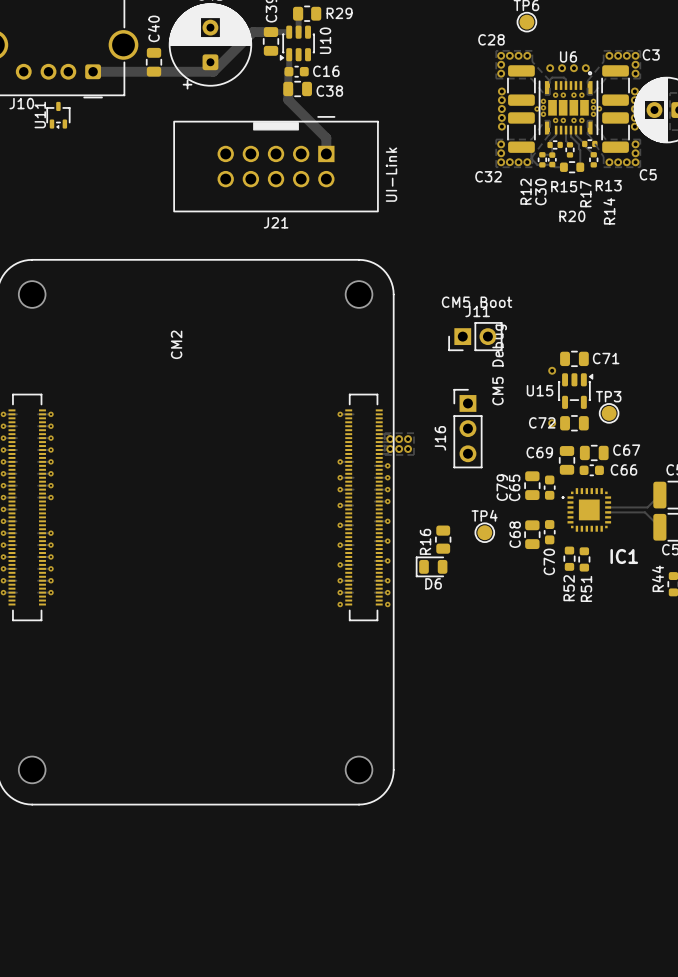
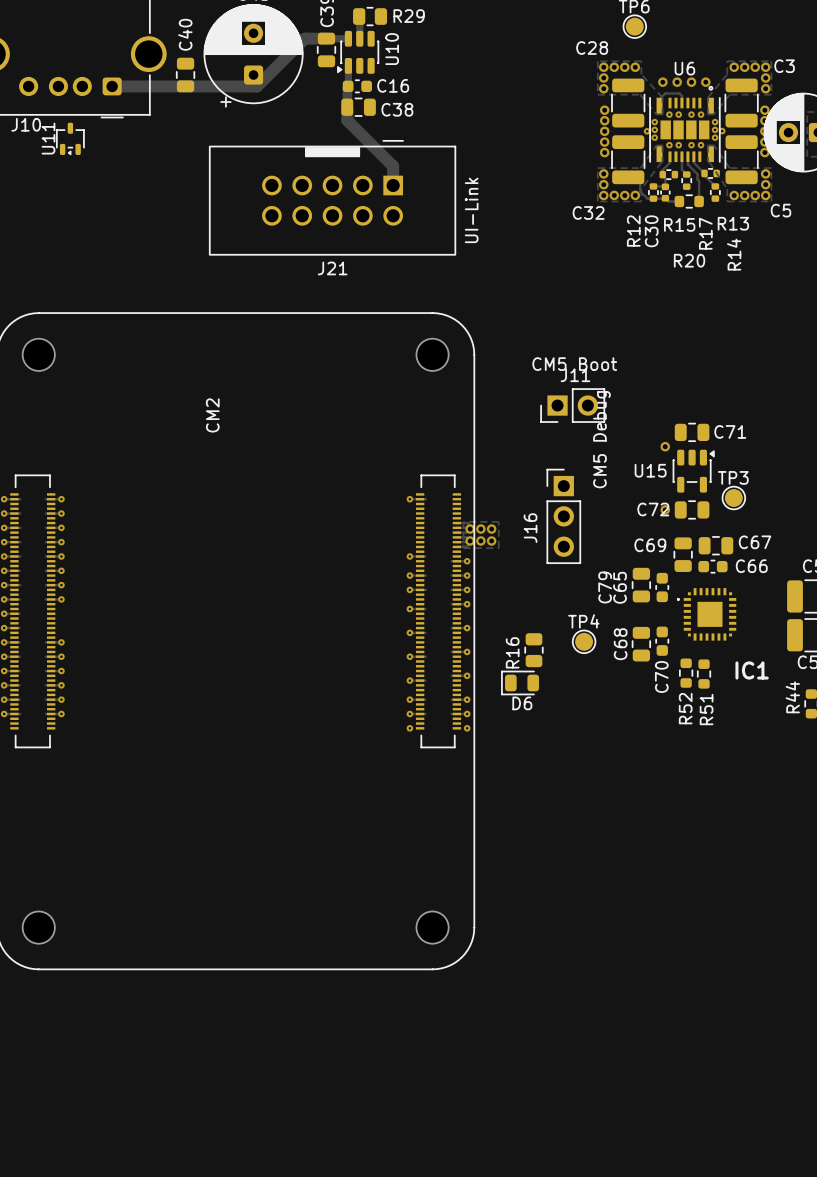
track: (659, 495) (647, 507) (608, 507) -> none
track: (608, 512) (645, 512) (659, 527) -> none

